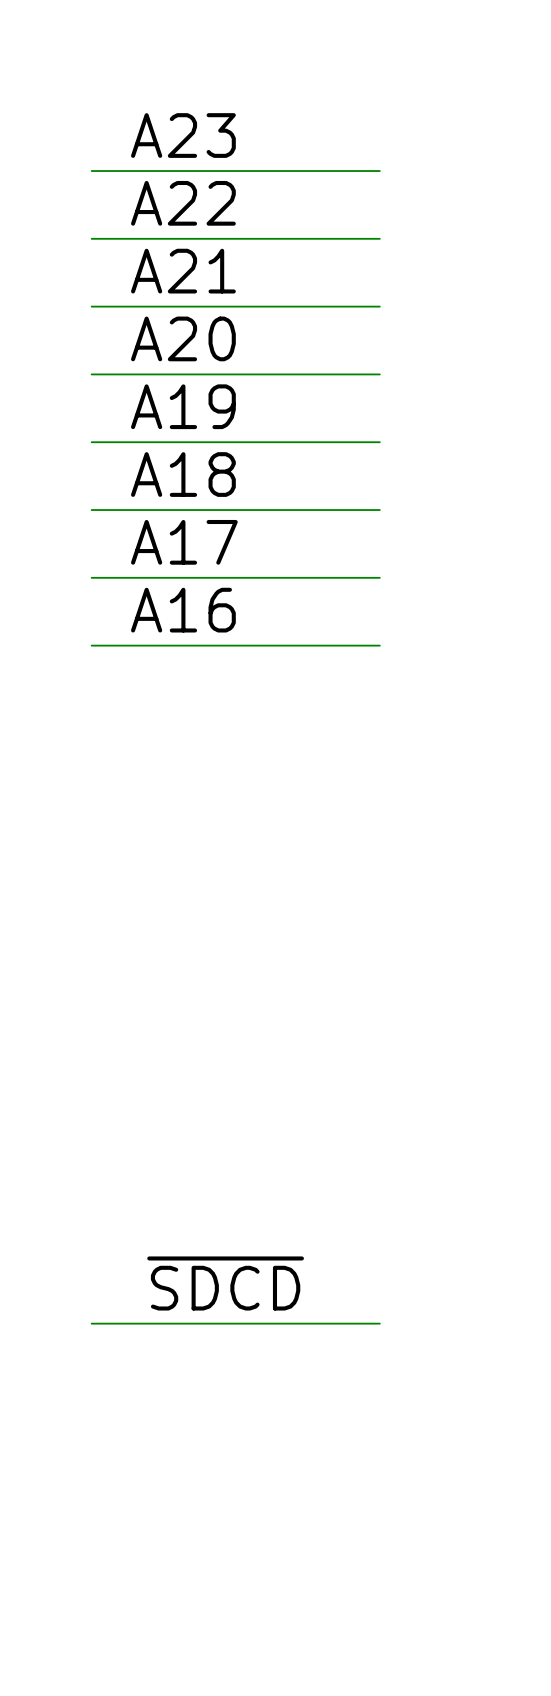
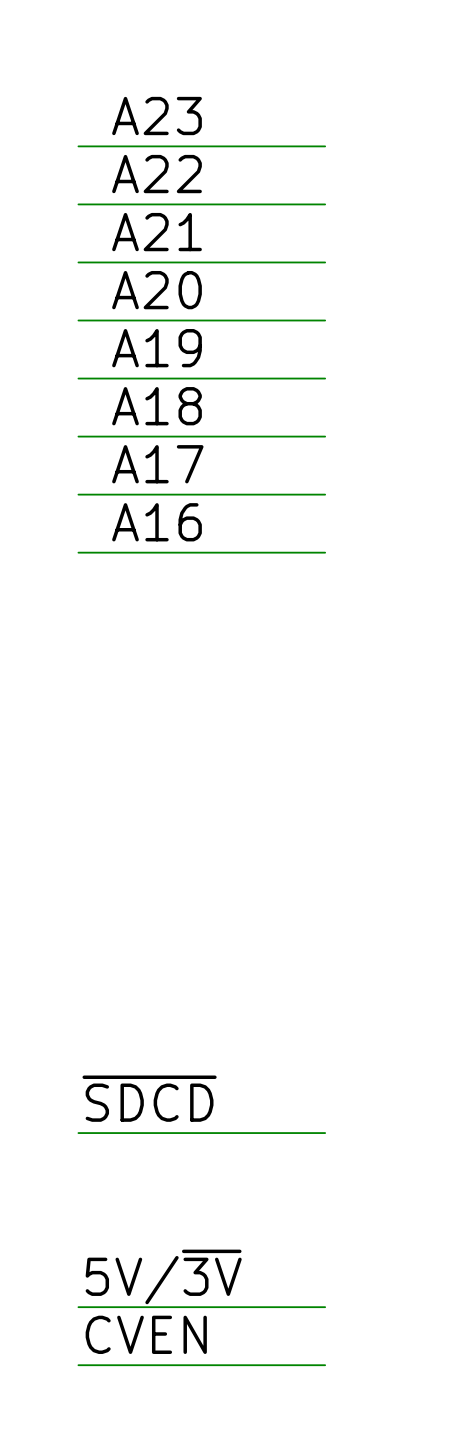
label position: ~{SDCD} (225, 1283) -> ~{SDCD} (149, 1098)
label: none -> 5V/~{3V} (163, 1276)
wire: none -> (78, 1307) (325, 1307)
label: none -> CVEN (146, 1334)
wire: none -> (78, 1365) (325, 1365)

